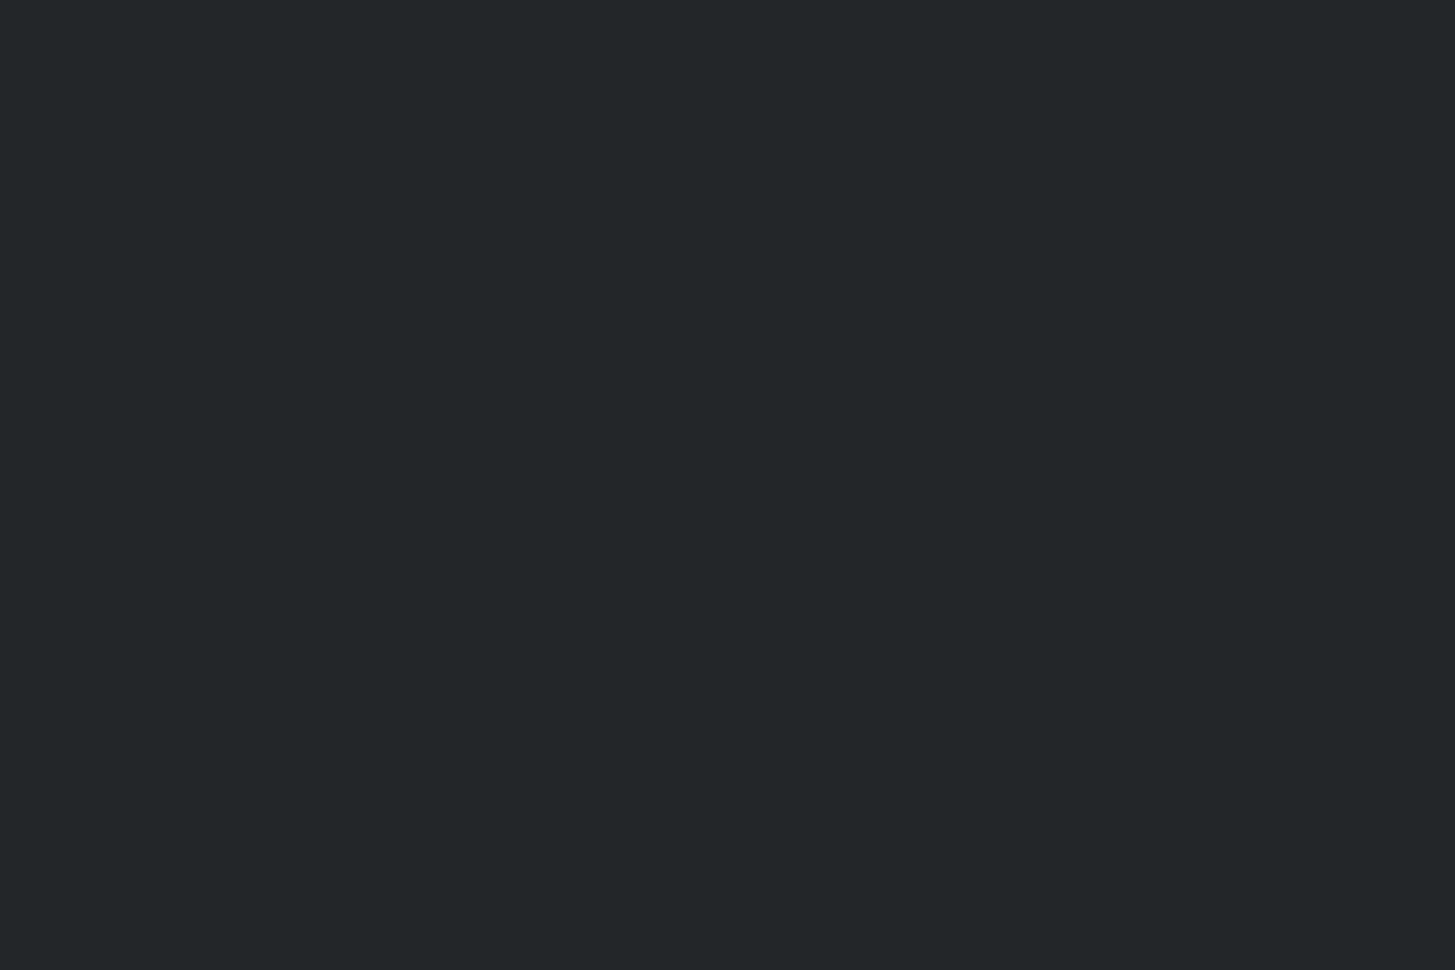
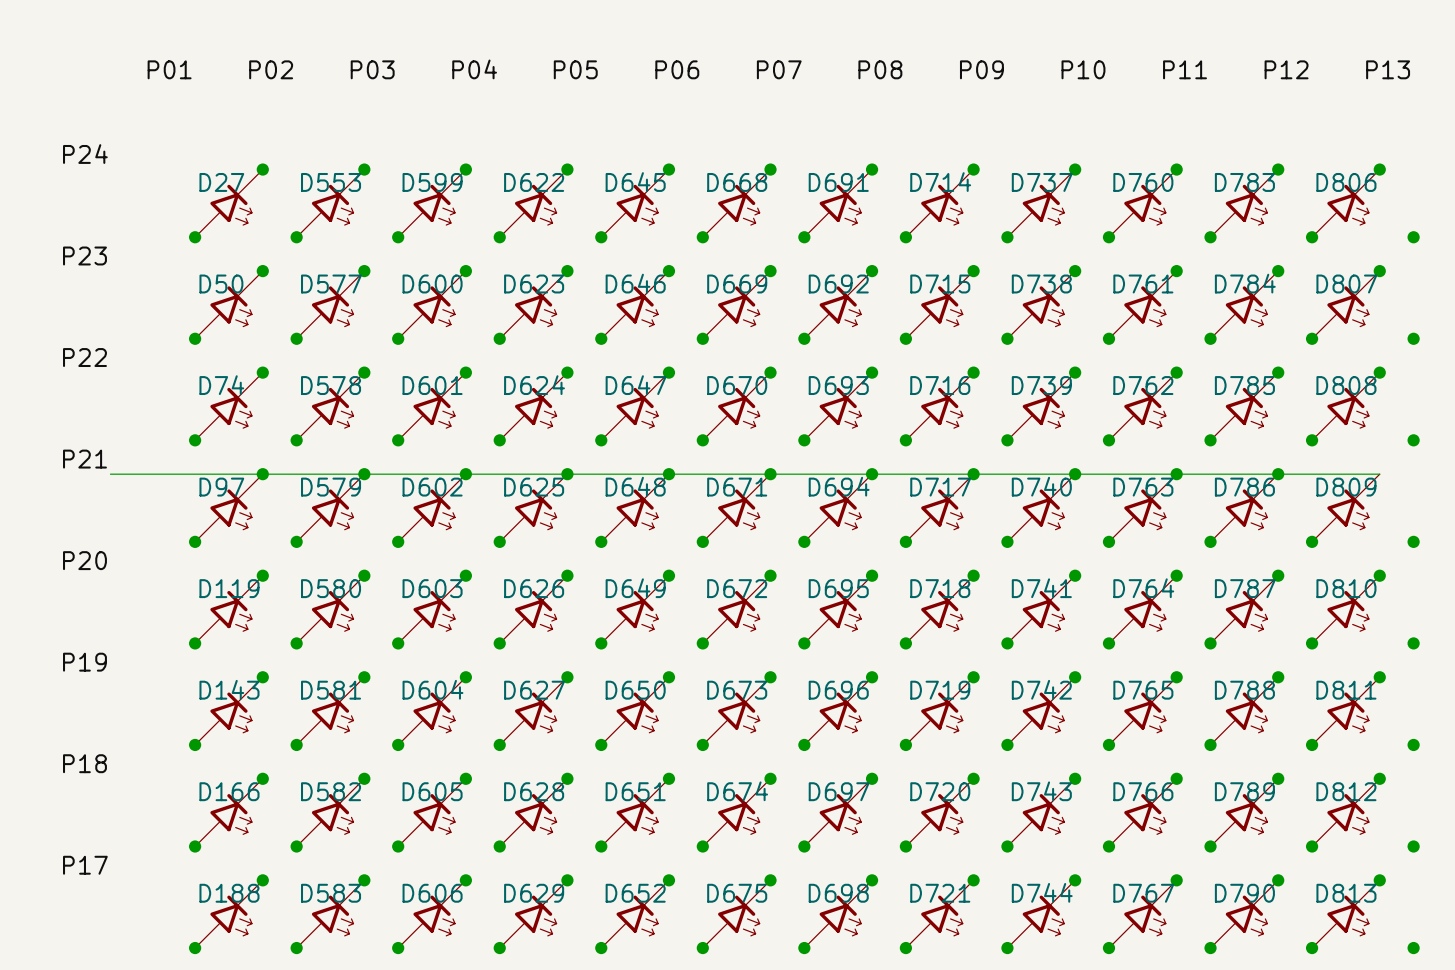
label: none -> P01 (169, 69)
label: none -> P02 (271, 69)
label: none -> P03 (372, 69)
label: none -> P04 (474, 69)
label: none -> P05 (575, 69)
label: none -> P06 (677, 69)
label: none -> P07 (779, 69)
label: none -> P08 (880, 69)
label: none -> P09 (981, 69)
label: none -> P10 (1083, 69)
label: none -> P11 (1185, 69)
label: none -> P12 (1286, 69)
label: none -> P13 (1388, 69)
label: none -> P24 (85, 154)
junction: none -> (262, 169)
junction: none -> (364, 169)
junction: none -> (465, 169)
junction: none -> (567, 169)
junction: none -> (668, 169)
junction: none -> (770, 169)
junction: none -> (872, 169)
junction: none -> (973, 169)
junction: none -> (1075, 169)
junction: none -> (1176, 169)
junction: none -> (1278, 169)
junction: none -> (1379, 169)
D27: none -> (228, 203)
D553: none -> (330, 203)
D599: none -> (432, 203)
D622: none -> (533, 203)
D645: none -> (635, 203)
D668: none -> (736, 203)
D691: none -> (838, 203)
D714: none -> (939, 203)
D737: none -> (1041, 203)
D760: none -> (1142, 203)
D783: none -> (1244, 203)
D806: none -> (1345, 203)
junction: none -> (195, 237)
junction: none -> (296, 237)
junction: none -> (398, 237)
junction: none -> (499, 237)
junction: none -> (601, 237)
junction: none -> (702, 237)
junction: none -> (804, 237)
junction: none -> (905, 237)
junction: none -> (1007, 237)
junction: none -> (1108, 237)
junction: none -> (1210, 237)
junction: none -> (1312, 237)
junction: none -> (1413, 237)
label: none -> P23 (84, 255)
junction: none -> (262, 271)
junction: none -> (364, 271)
junction: none -> (465, 271)
junction: none -> (567, 271)
junction: none -> (668, 271)
junction: none -> (770, 271)
junction: none -> (872, 271)
junction: none -> (973, 271)
junction: none -> (1075, 271)
junction: none -> (1176, 271)
junction: none -> (1278, 271)
junction: none -> (1379, 271)
D50: none -> (228, 304)
D577: none -> (330, 304)
D600: none -> (432, 304)
D623: none -> (533, 304)
D646: none -> (635, 304)
D669: none -> (736, 304)
D692: none -> (838, 304)
D715: none -> (939, 304)
D738: none -> (1041, 304)
D761: none -> (1142, 304)
D784: none -> (1244, 304)
D807: none -> (1345, 304)
junction: none -> (195, 338)
junction: none -> (296, 338)
junction: none -> (398, 338)
junction: none -> (499, 338)
junction: none -> (601, 338)
junction: none -> (702, 338)
junction: none -> (804, 338)
junction: none -> (905, 338)
junction: none -> (1007, 338)
junction: none -> (1108, 338)
junction: none -> (1210, 338)
junction: none -> (1312, 338)
junction: none -> (1413, 338)
label: none -> P22 (84, 357)
junction: none -> (262, 372)
junction: none -> (364, 372)
junction: none -> (465, 372)
junction: none -> (567, 372)
junction: none -> (668, 372)
junction: none -> (770, 372)
junction: none -> (872, 372)
junction: none -> (973, 372)
junction: none -> (1075, 372)
junction: none -> (1176, 372)
junction: none -> (1278, 372)
junction: none -> (1379, 372)
D74: none -> (228, 406)
D578: none -> (330, 406)
D601: none -> (432, 406)
D624: none -> (533, 406)
D647: none -> (635, 406)
D670: none -> (736, 406)
D693: none -> (838, 406)
D716: none -> (939, 406)
D739: none -> (1041, 406)
D762: none -> (1142, 406)
D785: none -> (1244, 406)
D808: none -> (1345, 406)
junction: none -> (195, 440)
junction: none -> (296, 440)
junction: none -> (398, 440)
junction: none -> (499, 440)
junction: none -> (601, 440)
junction: none -> (702, 440)
junction: none -> (804, 440)
junction: none -> (905, 440)
junction: none -> (1007, 440)
junction: none -> (1108, 440)
junction: none -> (1210, 440)
junction: none -> (1312, 440)
junction: none -> (1413, 440)
label: none -> P21 (84, 459)
wire: none -> (110, 474) (1379, 474)
junction: none -> (262, 474)
junction: none -> (364, 474)
junction: none -> (465, 474)
junction: none -> (567, 474)
junction: none -> (668, 474)
junction: none -> (770, 474)
junction: none -> (872, 474)
junction: none -> (973, 474)
junction: none -> (1075, 474)
junction: none -> (1176, 474)
junction: none -> (1278, 474)
D97: none -> (228, 508)
D579: none -> (330, 508)
D602: none -> (432, 508)
D625: none -> (533, 508)
D648: none -> (635, 508)
D671: none -> (736, 508)
D694: none -> (838, 508)
D717: none -> (939, 508)
D740: none -> (1041, 508)
D763: none -> (1142, 508)
D786: none -> (1244, 508)
D809: none -> (1345, 508)
junction: none -> (195, 541)
junction: none -> (296, 541)
junction: none -> (398, 541)
junction: none -> (499, 541)
junction: none -> (601, 541)
junction: none -> (702, 541)
junction: none -> (804, 541)
junction: none -> (905, 541)
junction: none -> (1007, 541)
junction: none -> (1108, 541)
junction: none -> (1210, 541)
junction: none -> (1312, 541)
junction: none -> (1413, 541)
label: none -> P20 (84, 560)
junction: none -> (262, 575)
junction: none -> (364, 575)
junction: none -> (465, 575)
junction: none -> (567, 575)
junction: none -> (668, 575)
junction: none -> (770, 575)
junction: none -> (872, 575)
junction: none -> (973, 575)
junction: none -> (1075, 575)
junction: none -> (1176, 575)
junction: none -> (1278, 575)
junction: none -> (1379, 575)
D119: none -> (228, 609)
D580: none -> (330, 609)
D603: none -> (432, 609)
D626: none -> (533, 609)
D649: none -> (635, 609)
D672: none -> (736, 609)
D695: none -> (838, 609)
D718: none -> (939, 609)
D741: none -> (1041, 609)
D764: none -> (1142, 609)
D787: none -> (1244, 609)
D810: none -> (1345, 609)
junction: none -> (195, 643)
junction: none -> (296, 643)
junction: none -> (398, 643)
junction: none -> (499, 643)
junction: none -> (601, 643)
junction: none -> (702, 643)
junction: none -> (804, 643)
junction: none -> (905, 643)
junction: none -> (1007, 643)
junction: none -> (1108, 643)
junction: none -> (1210, 643)
junction: none -> (1312, 643)
junction: none -> (1413, 643)
label: none -> P19 (84, 662)
junction: none -> (262, 677)
junction: none -> (364, 677)
junction: none -> (465, 677)
junction: none -> (567, 677)
junction: none -> (668, 677)
junction: none -> (770, 677)
junction: none -> (872, 677)
junction: none -> (973, 677)
junction: none -> (1075, 677)
junction: none -> (1176, 677)
junction: none -> (1278, 677)
junction: none -> (1379, 677)
D143: none -> (228, 711)
D581: none -> (330, 711)
D604: none -> (432, 711)
D627: none -> (533, 711)
D650: none -> (635, 711)
D673: none -> (736, 711)
D696: none -> (838, 711)
D719: none -> (939, 711)
D742: none -> (1041, 711)
D765: none -> (1142, 711)
D788: none -> (1244, 711)
D811: none -> (1345, 711)
junction: none -> (195, 744)
junction: none -> (296, 744)
junction: none -> (398, 744)
junction: none -> (499, 744)
junction: none -> (601, 744)
junction: none -> (702, 744)
junction: none -> (804, 744)
junction: none -> (905, 744)
junction: none -> (1007, 744)
junction: none -> (1108, 744)
junction: none -> (1210, 744)
junction: none -> (1312, 744)
junction: none -> (1413, 744)
label: none -> P18 (84, 763)
junction: none -> (262, 778)
junction: none -> (364, 778)
junction: none -> (465, 778)
junction: none -> (567, 778)
junction: none -> (668, 778)
junction: none -> (770, 778)
junction: none -> (872, 778)
junction: none -> (973, 778)
junction: none -> (1075, 778)
junction: none -> (1176, 778)
junction: none -> (1278, 778)
junction: none -> (1379, 778)
D166: none -> (228, 812)
D582: none -> (330, 812)
D605: none -> (432, 812)
D628: none -> (533, 812)
D651: none -> (635, 812)
D674: none -> (736, 812)
D697: none -> (838, 812)
D720: none -> (939, 812)
D743: none -> (1041, 812)
D766: none -> (1142, 812)
D789: none -> (1244, 812)
D812: none -> (1345, 812)
junction: none -> (195, 846)
junction: none -> (296, 846)
junction: none -> (398, 846)
junction: none -> (499, 846)
junction: none -> (601, 846)
junction: none -> (702, 846)
junction: none -> (804, 846)
junction: none -> (905, 846)
junction: none -> (1007, 846)
junction: none -> (1108, 846)
junction: none -> (1210, 846)
junction: none -> (1312, 846)
junction: none -> (1413, 846)
label: none -> P17 (85, 865)
junction: none -> (262, 880)
junction: none -> (364, 880)
junction: none -> (465, 880)
junction: none -> (567, 880)
junction: none -> (668, 880)
junction: none -> (770, 880)
junction: none -> (872, 880)
junction: none -> (973, 880)
junction: none -> (1075, 880)
junction: none -> (1176, 880)
junction: none -> (1278, 880)
junction: none -> (1379, 880)
D188: none -> (228, 914)
D583: none -> (330, 914)
D606: none -> (432, 914)
D629: none -> (533, 914)
D652: none -> (635, 914)
D675: none -> (736, 914)
D698: none -> (838, 914)
D721: none -> (939, 914)
D744: none -> (1041, 914)
D767: none -> (1142, 914)
D790: none -> (1244, 914)
D813: none -> (1345, 914)
junction: none -> (195, 948)
junction: none -> (296, 948)
junction: none -> (398, 948)
junction: none -> (499, 948)
junction: none -> (601, 948)
junction: none -> (702, 948)
junction: none -> (804, 948)
junction: none -> (905, 948)
junction: none -> (1007, 948)
junction: none -> (1108, 948)
junction: none -> (1210, 948)
junction: none -> (1312, 948)
junction: none -> (1413, 948)

